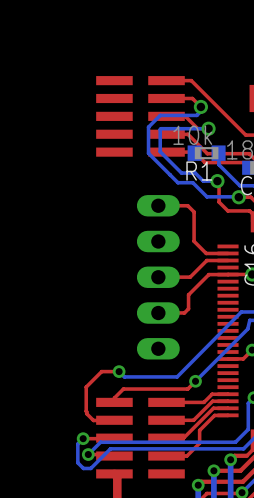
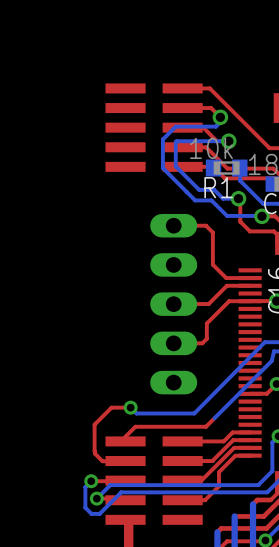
via: (195, 381) -> none
via: (230, 459) -> none
via: (213, 470) -> none
via: (198, 485) -> none

